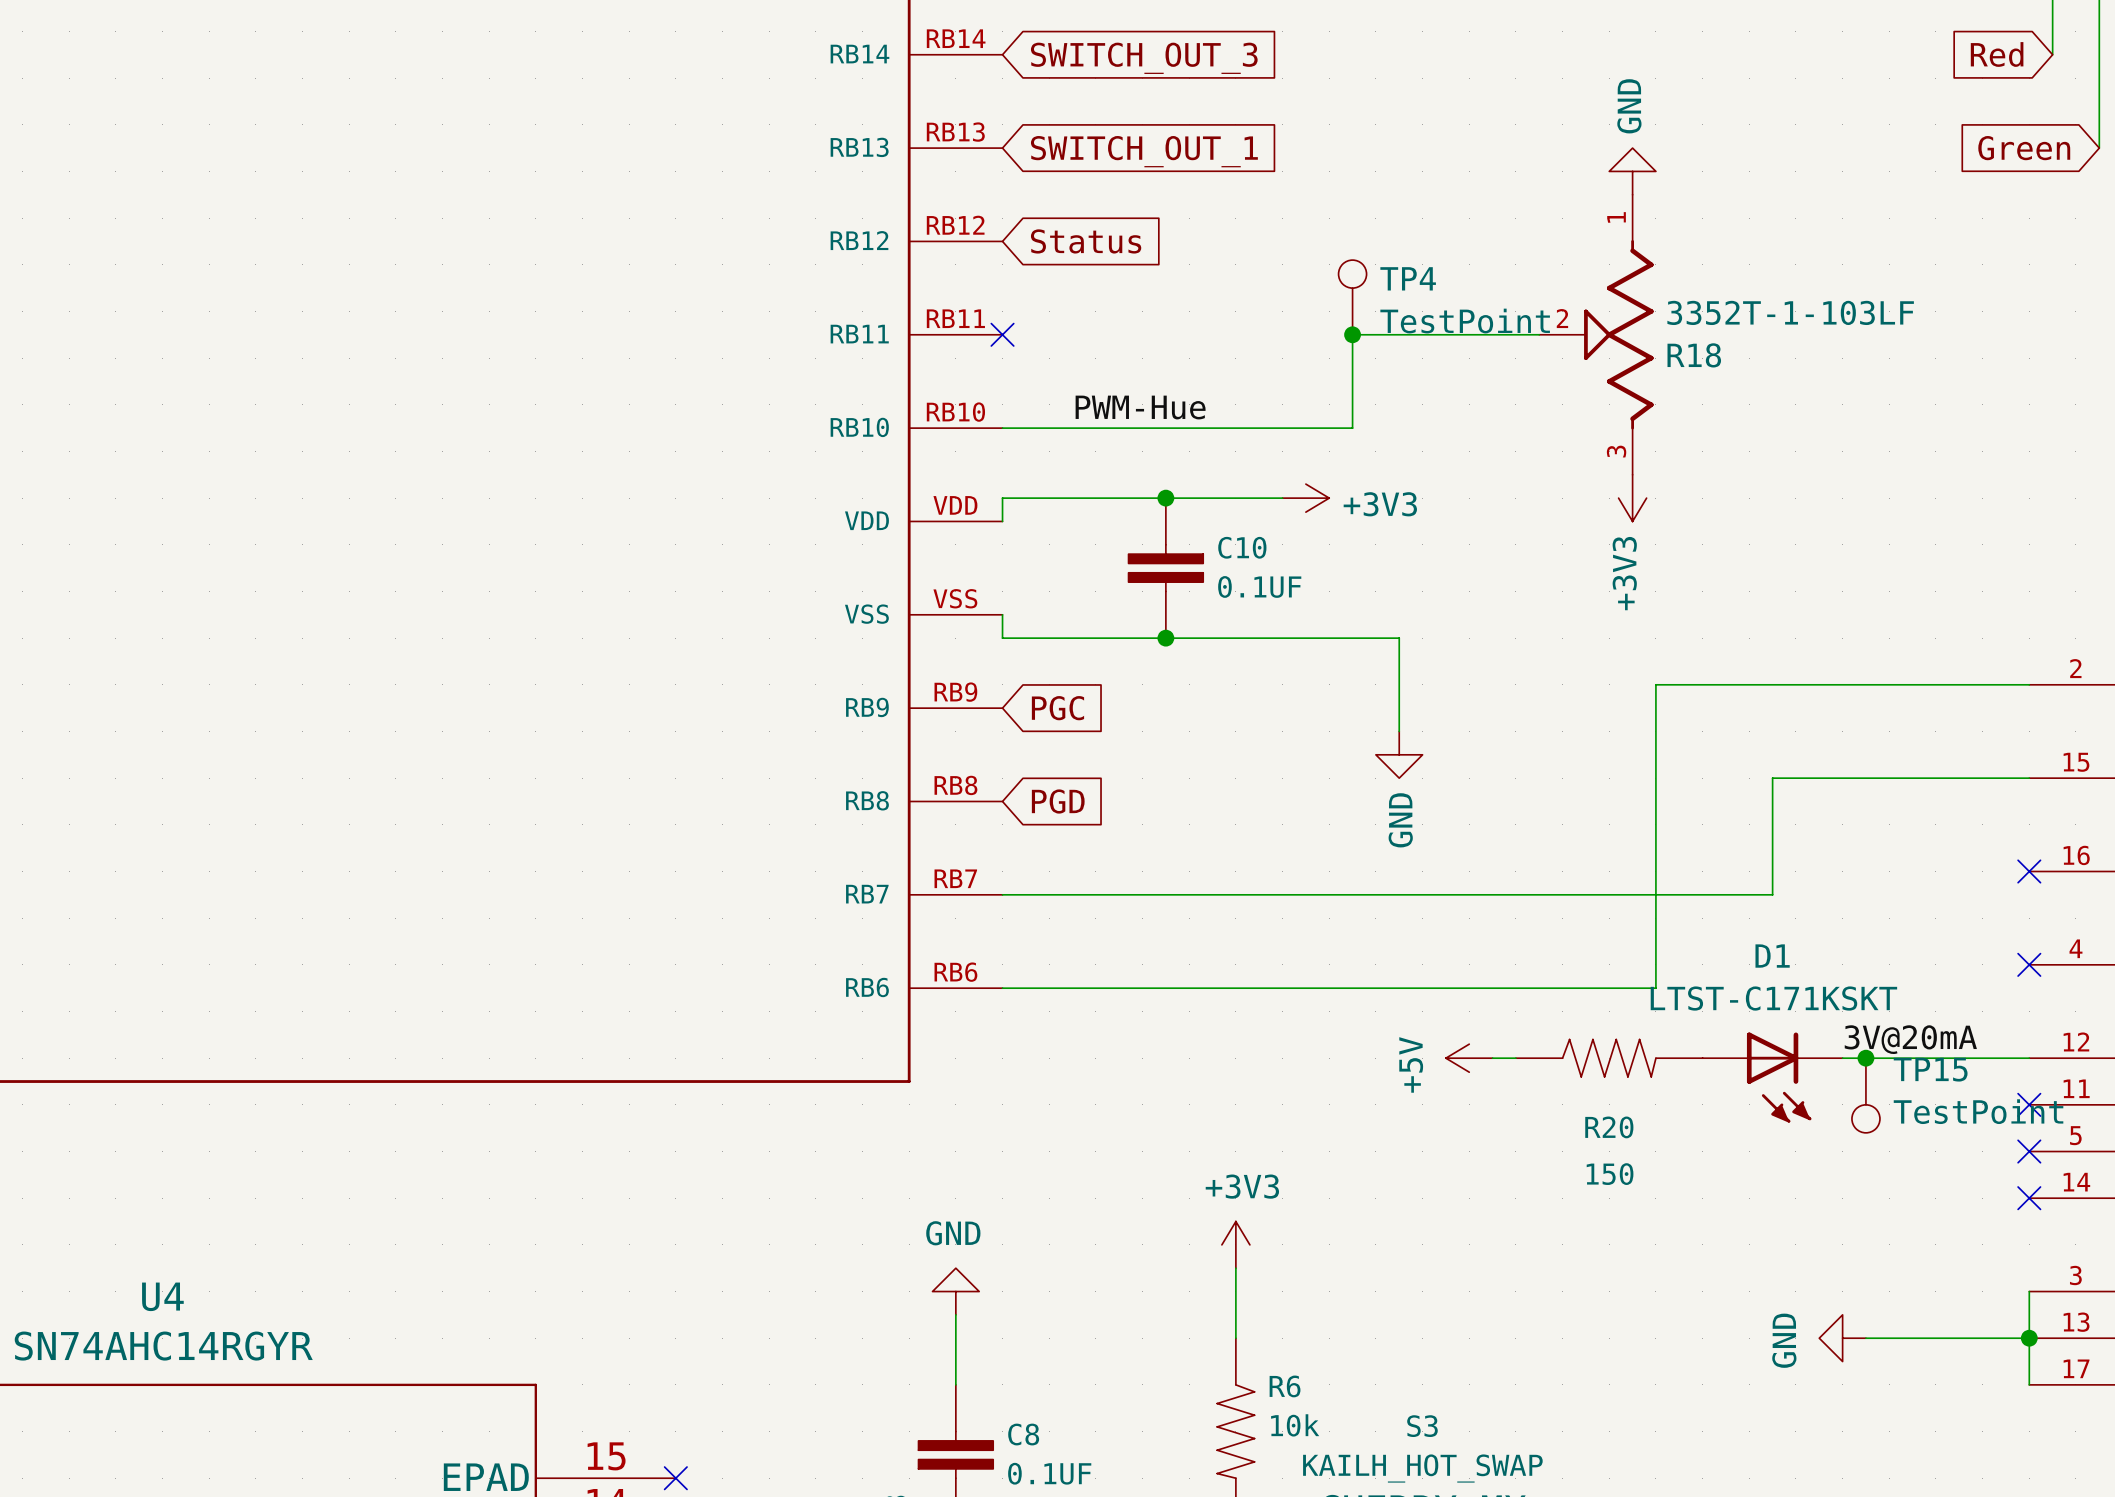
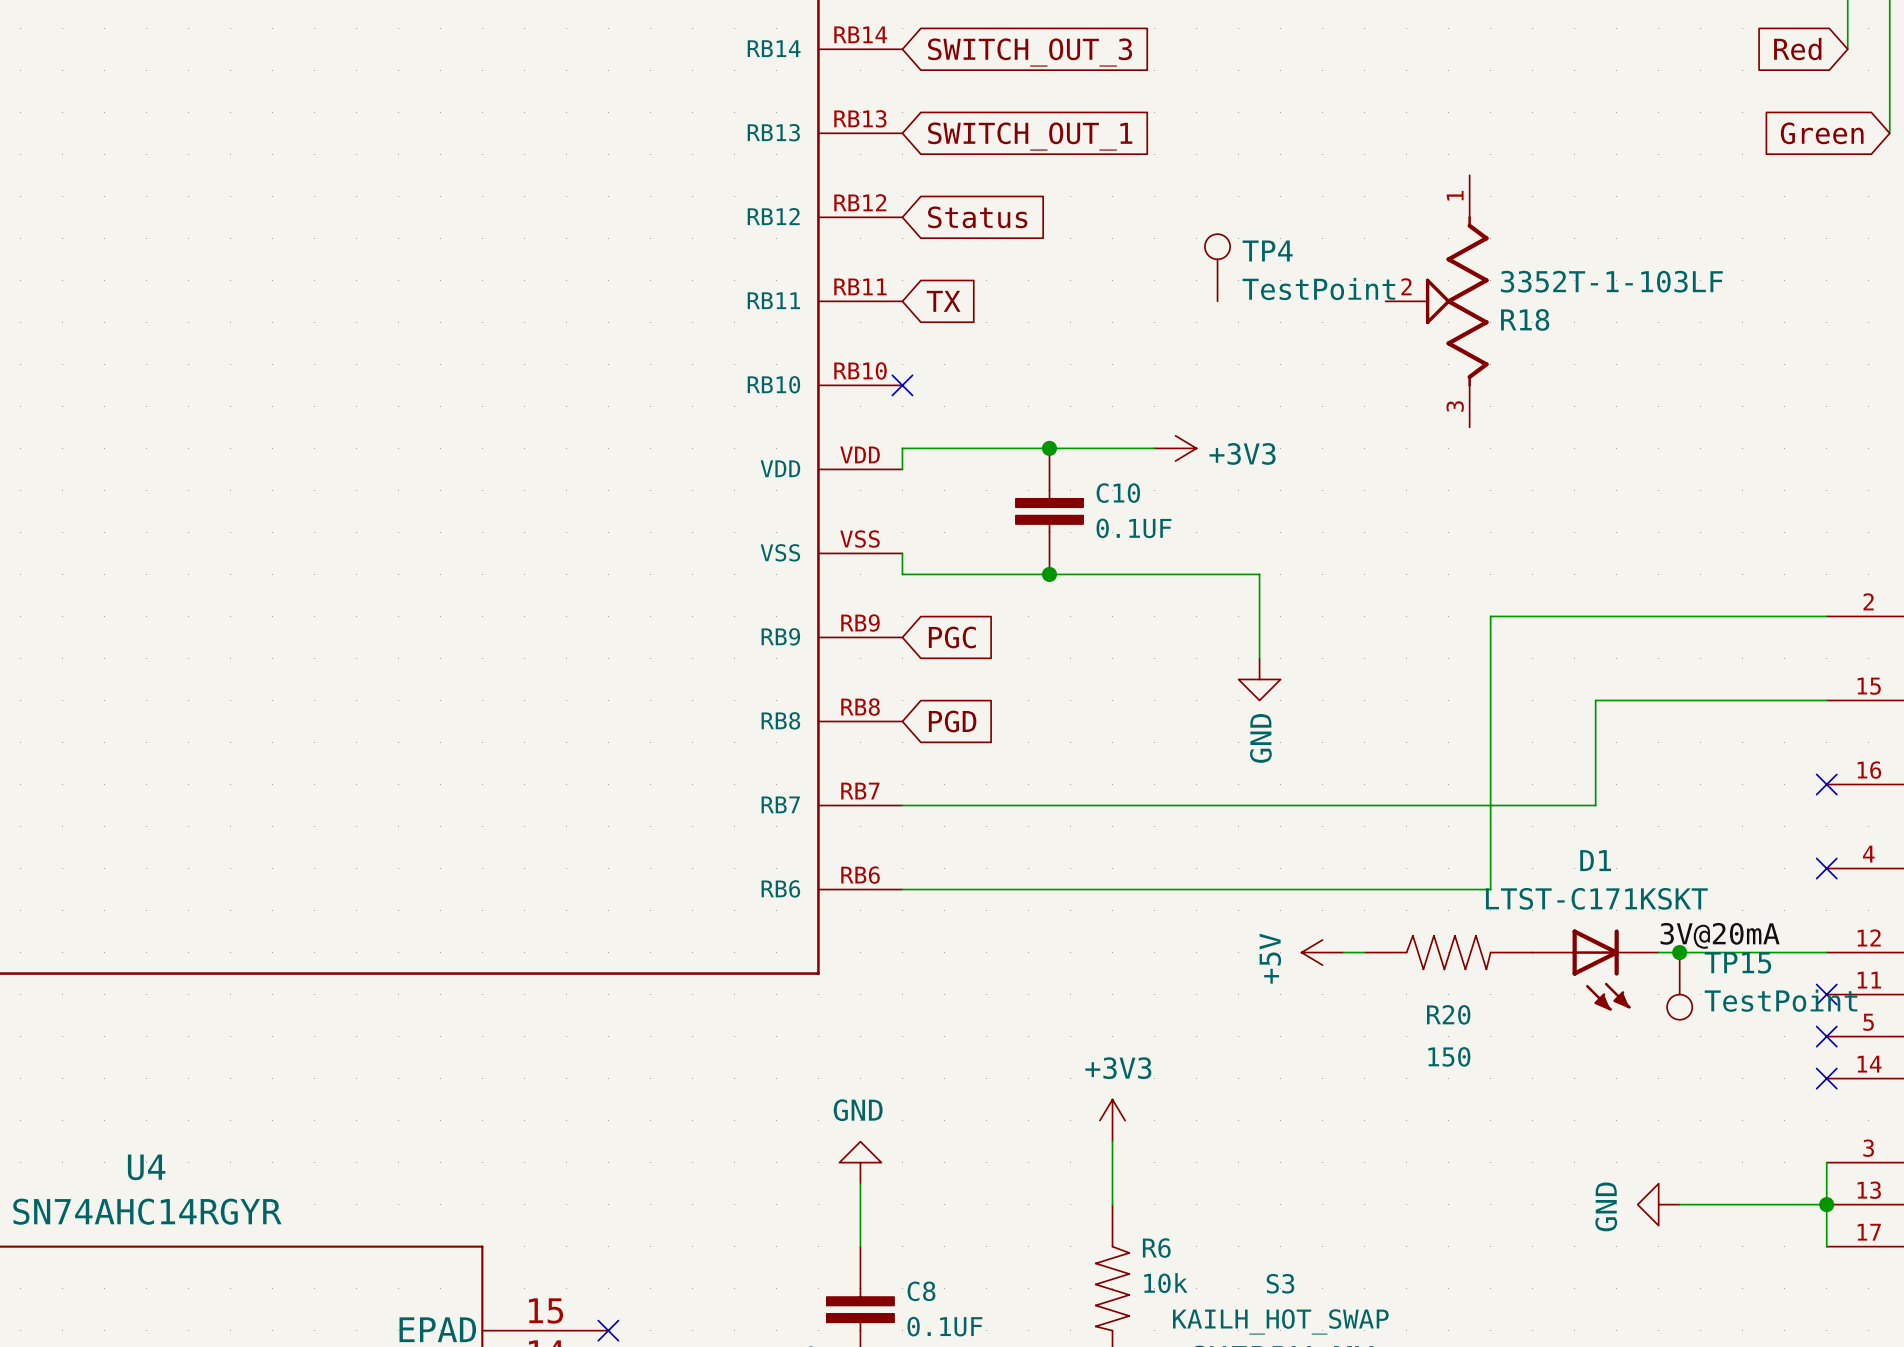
power symbol: GND (1632, 171) -> none
no-connect mark position: (1002, 334) -> (902, 385)
global label: none -> TX (943, 301)
junction: (1352, 334) -> none
wire: (1539, 334) (1352, 334) (1352, 428) (1002, 428) -> none
label: PWM-Hue (1140, 407) -> none
power symbol: +3V3 (1632, 498) -> none

